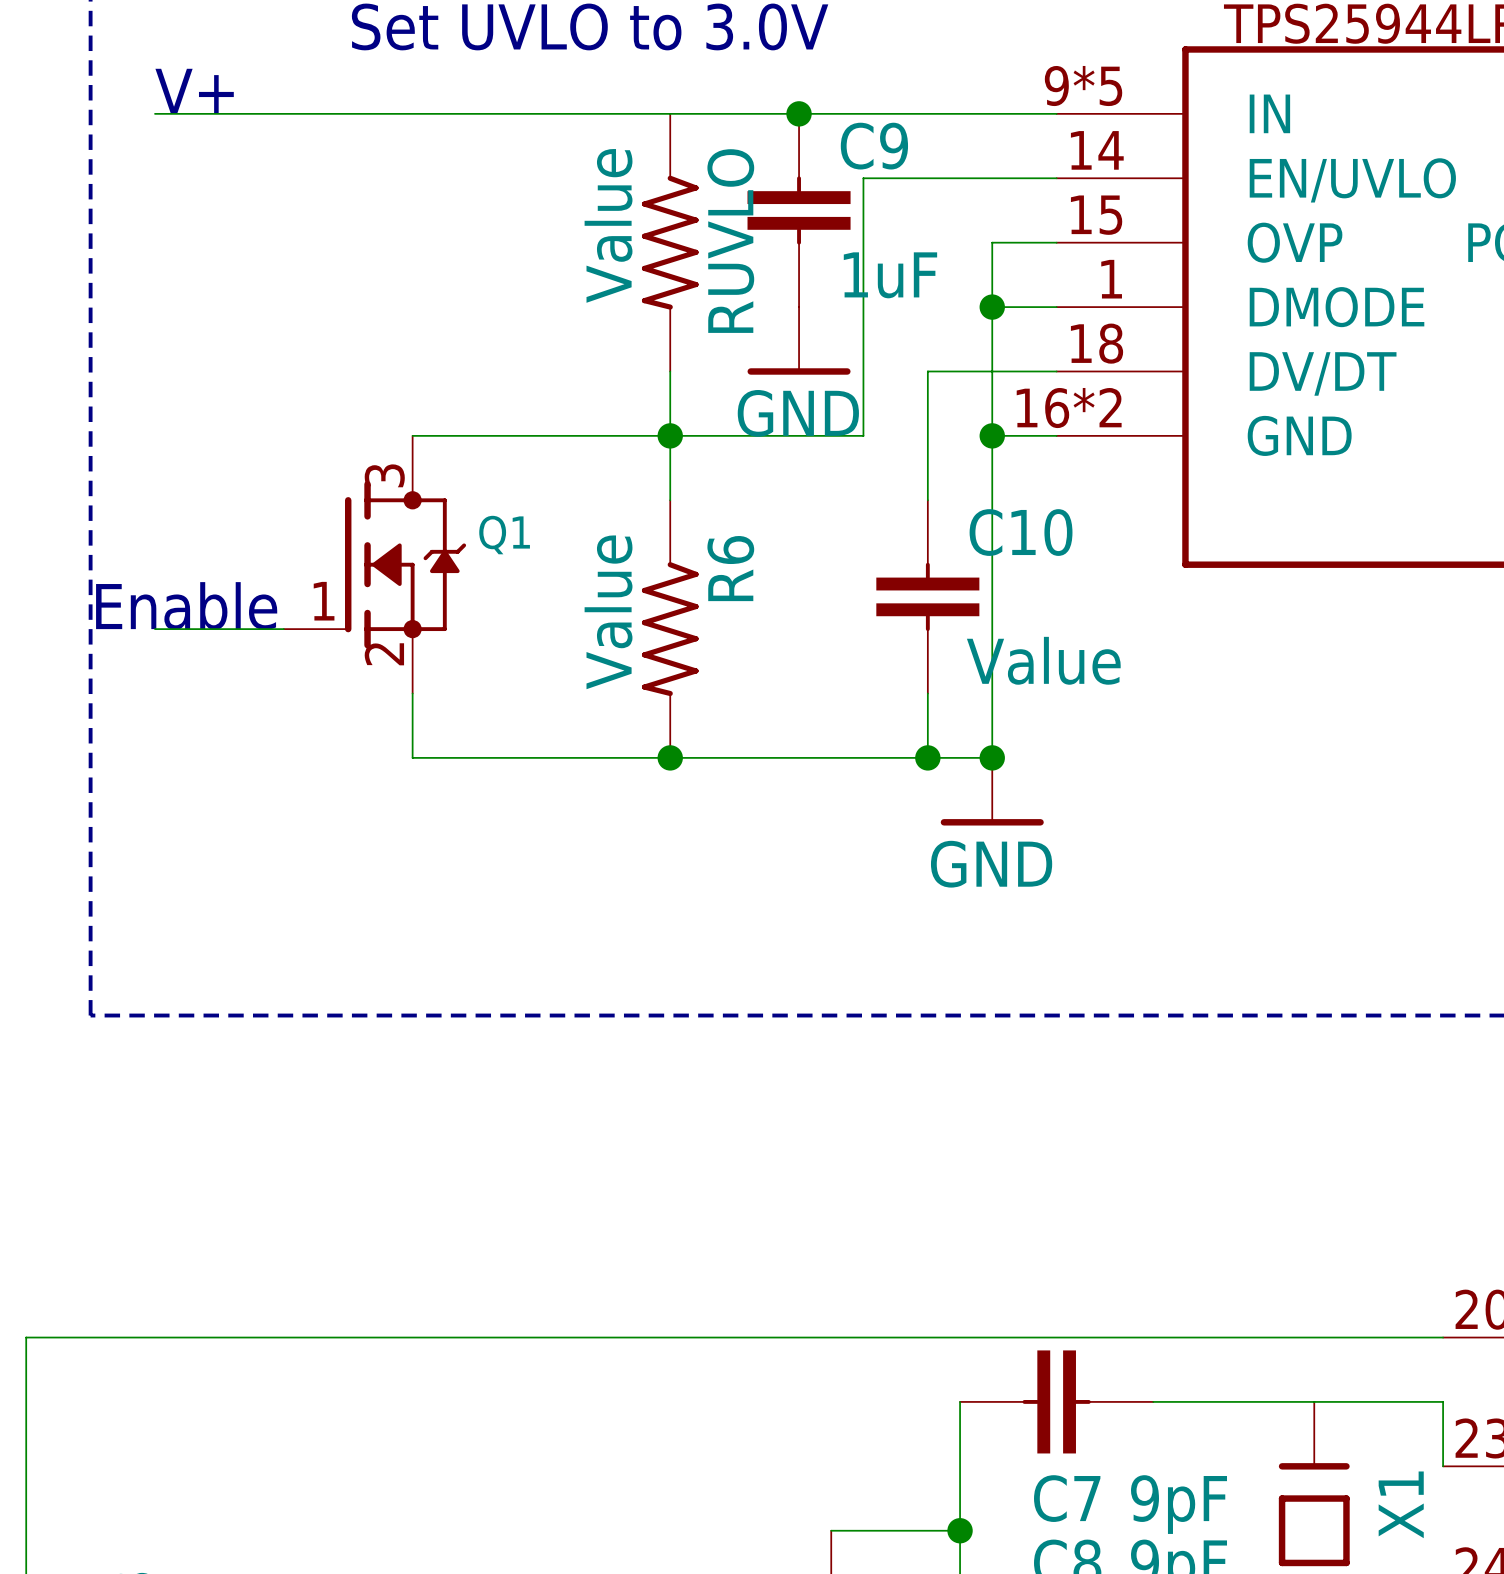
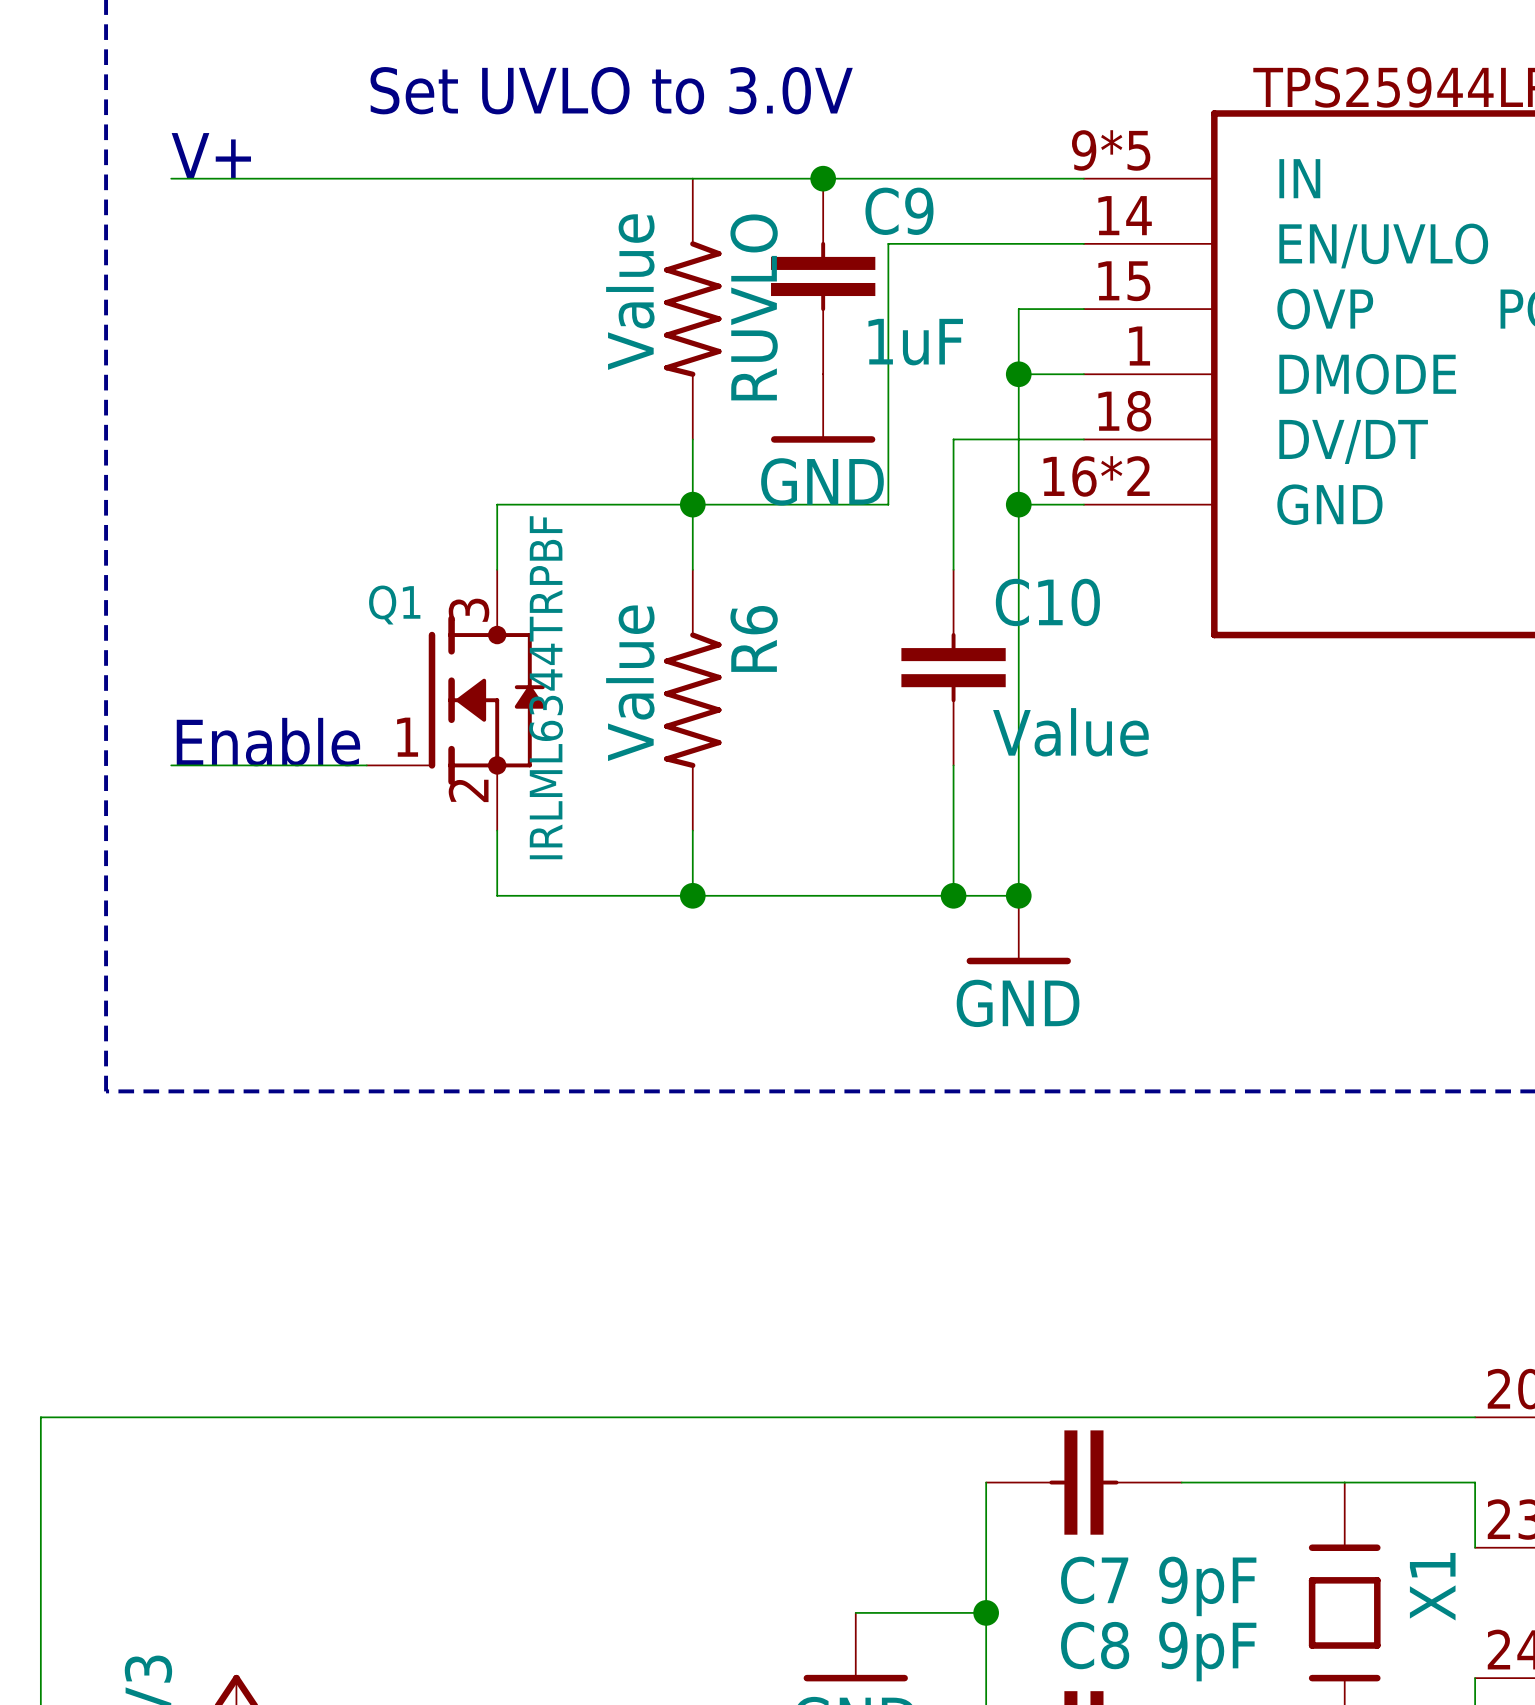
Q1 symbol: [283, 435, 467, 694] -> [366, 569, 545, 831]
wire: (412, 435) (477, 435) -> (497, 569) (497, 504)
Q1 name position: Q1 (504, 535) -> Q1 (394, 605)
text position: Enable (186, 606) -> Enable (268, 742)
Q1 value: none -> IRLML6344TRPBF (546, 687)
wire: (155, 629) (283, 629) -> none
wire: none -> (171, 765) (366, 765)
wire: (412, 693) (412, 757) (992, 757) -> (497, 830) (497, 895) (1018, 895) (1018, 830)
wire: none -> (692, 830) (692, 895)
junction position: (670, 757) -> (692, 895)
wire: none -> (953, 830) (953, 895)
junction: (927, 757) -> none
junction: (992, 757) -> none
power symbol position: GND (992, 791) -> GND (1018, 930)
junction: none -> (953, 895)
junction: none -> (1018, 895)

